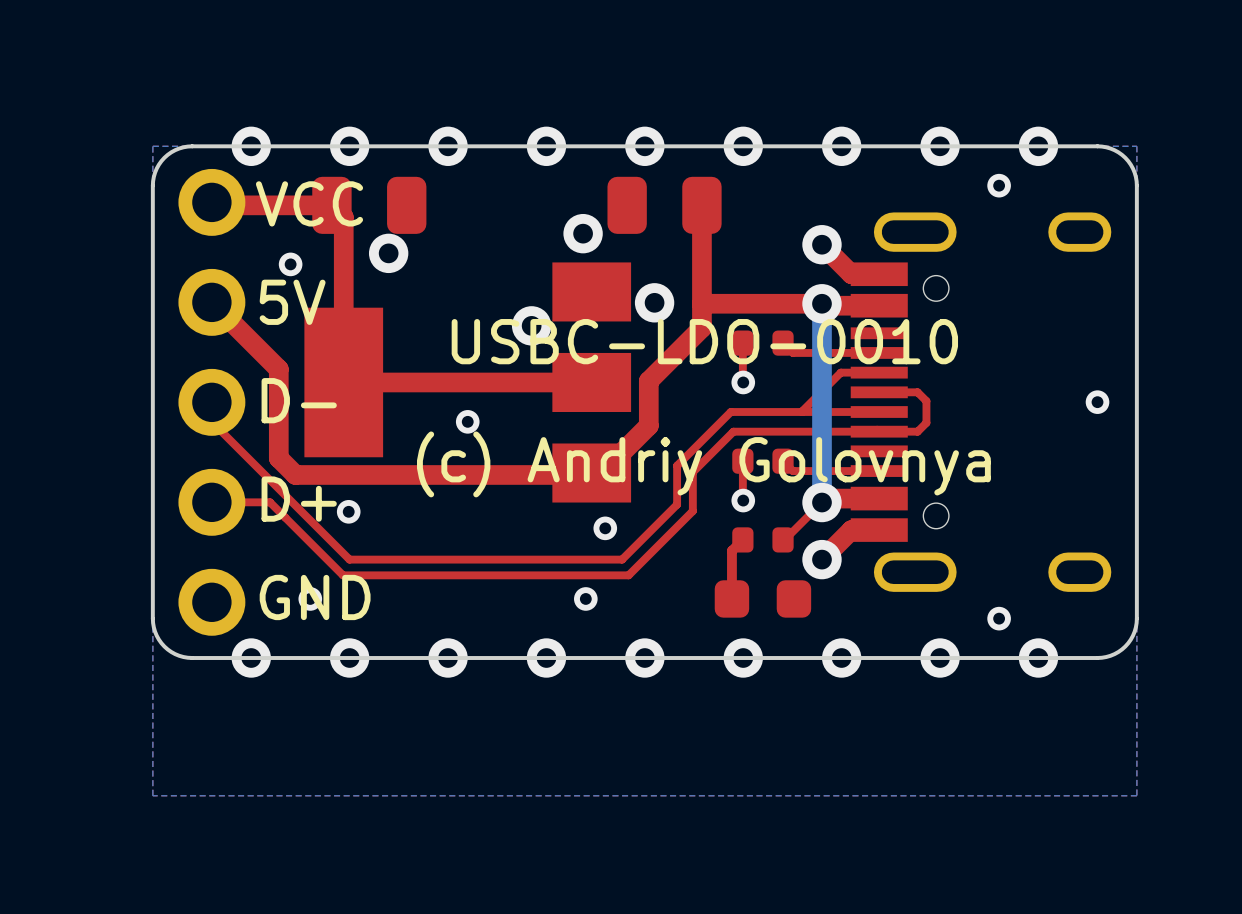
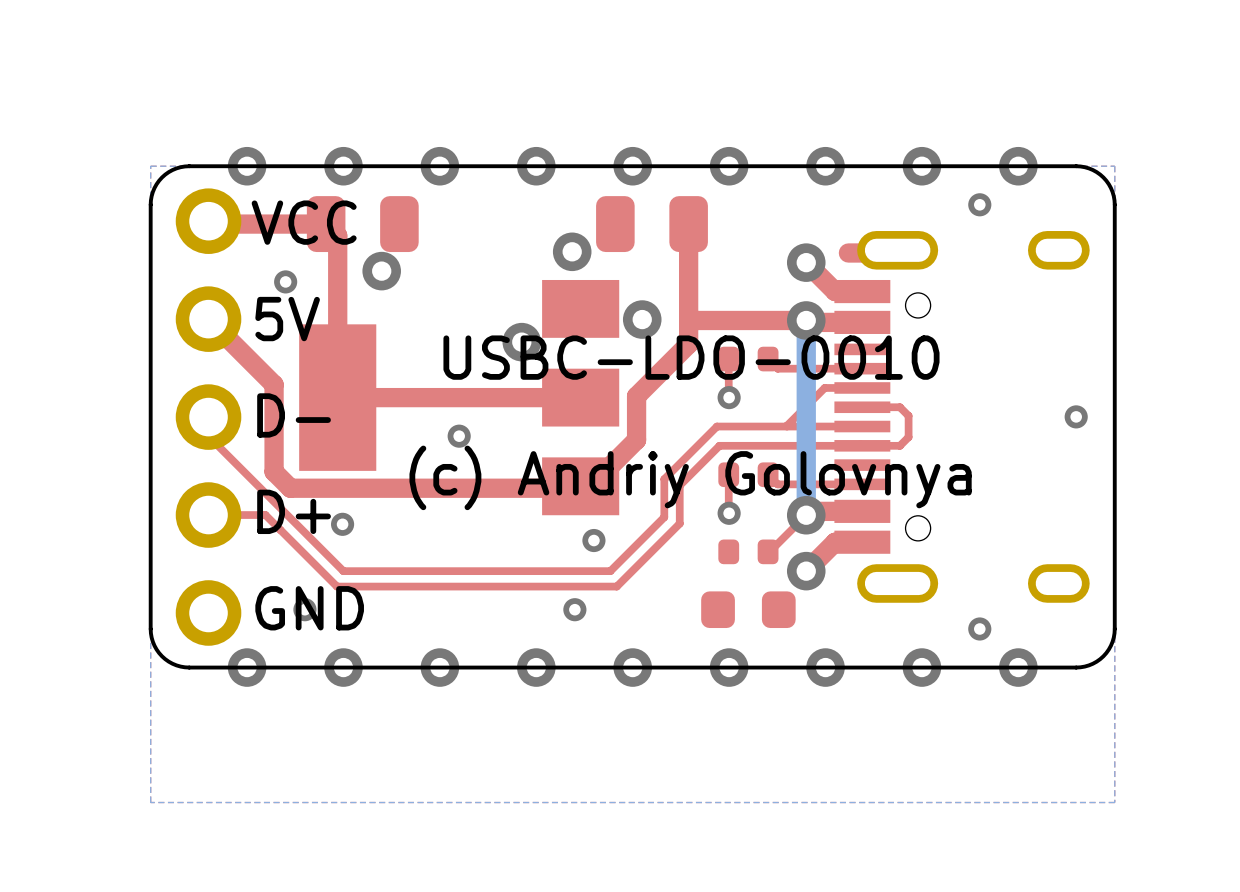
top track: none -> (862, 252) (848, 252)
top track: (742, 539) (731, 550) (731, 598) -> none

